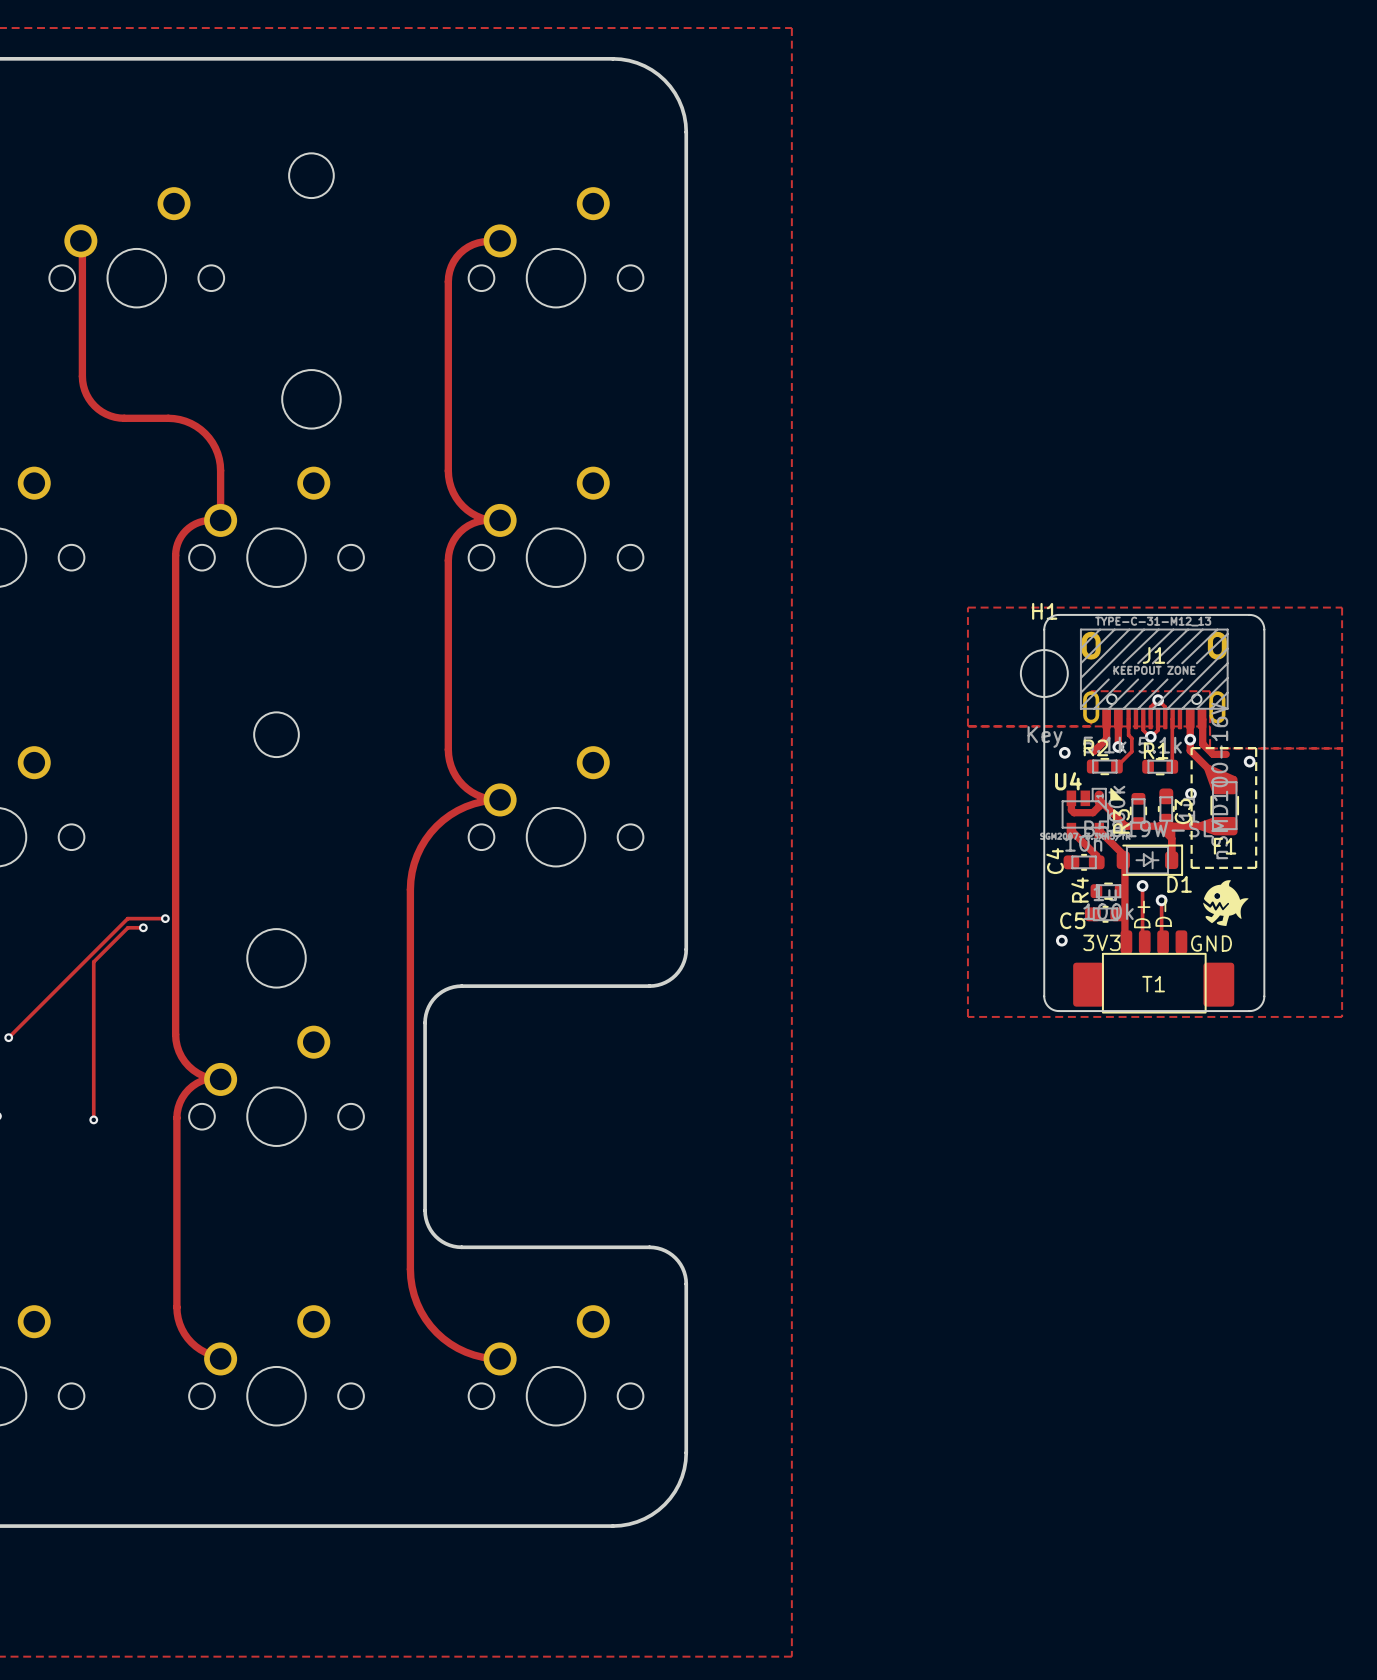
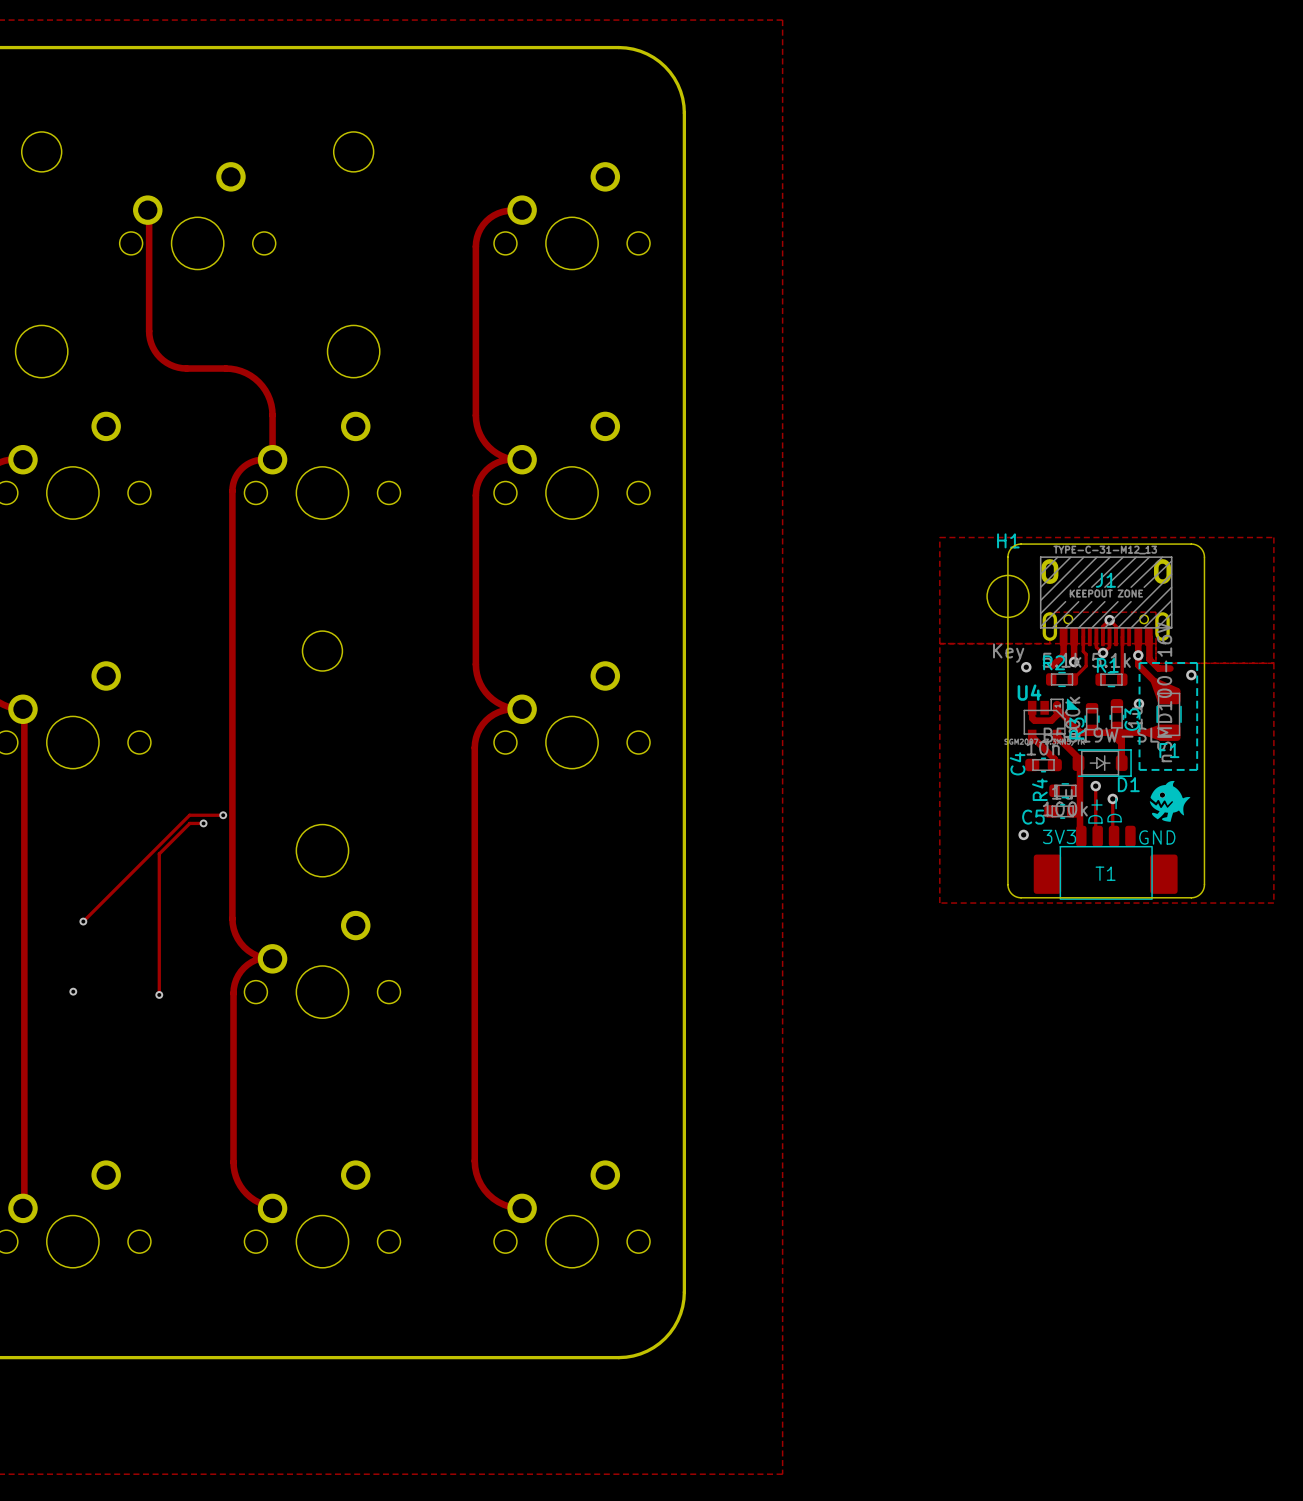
board edge: (608, 58) (637, 62) (658, 74) (670, 86) (678, 100) (685, 123) (685, 957) (680, 968) (672, 978) (653, 985) (453, 987) (442, 991) (433, 999) (427, 1010) (425, 1022) (425, 1210) (428, 1226) (435, 1236) (449, 1245) (461, 1247) (653, 1247) (672, 1255) (684, 1271) (686, 1283) (686, 1452) (682, 1476) (670, 1498) (651, 1514) (629, 1524) (608, 1526) -> (618, 47) (640, 51) (653, 57) (665, 66) (677, 84) (682, 98) (684, 113) (684, 1292) (680, 1313) (674, 1326) (665, 1338) (653, 1347) (640, 1353) (618, 1357)
track: (500, 799) (482, 801) (465, 806) (450, 815) (436, 826) (425, 839) (417, 855) (412, 872) (410, 889) (410, 1269) (412, 1286) (417, 1303) (425, 1319) (443, 1338) (465, 1352) (482, 1357) (500, 1358) -> (513, 709) (498, 712) (489, 717) (479, 728) (475, 742) (474, 1161) (478, 1179) (488, 1194) (503, 1204) (522, 1208)

